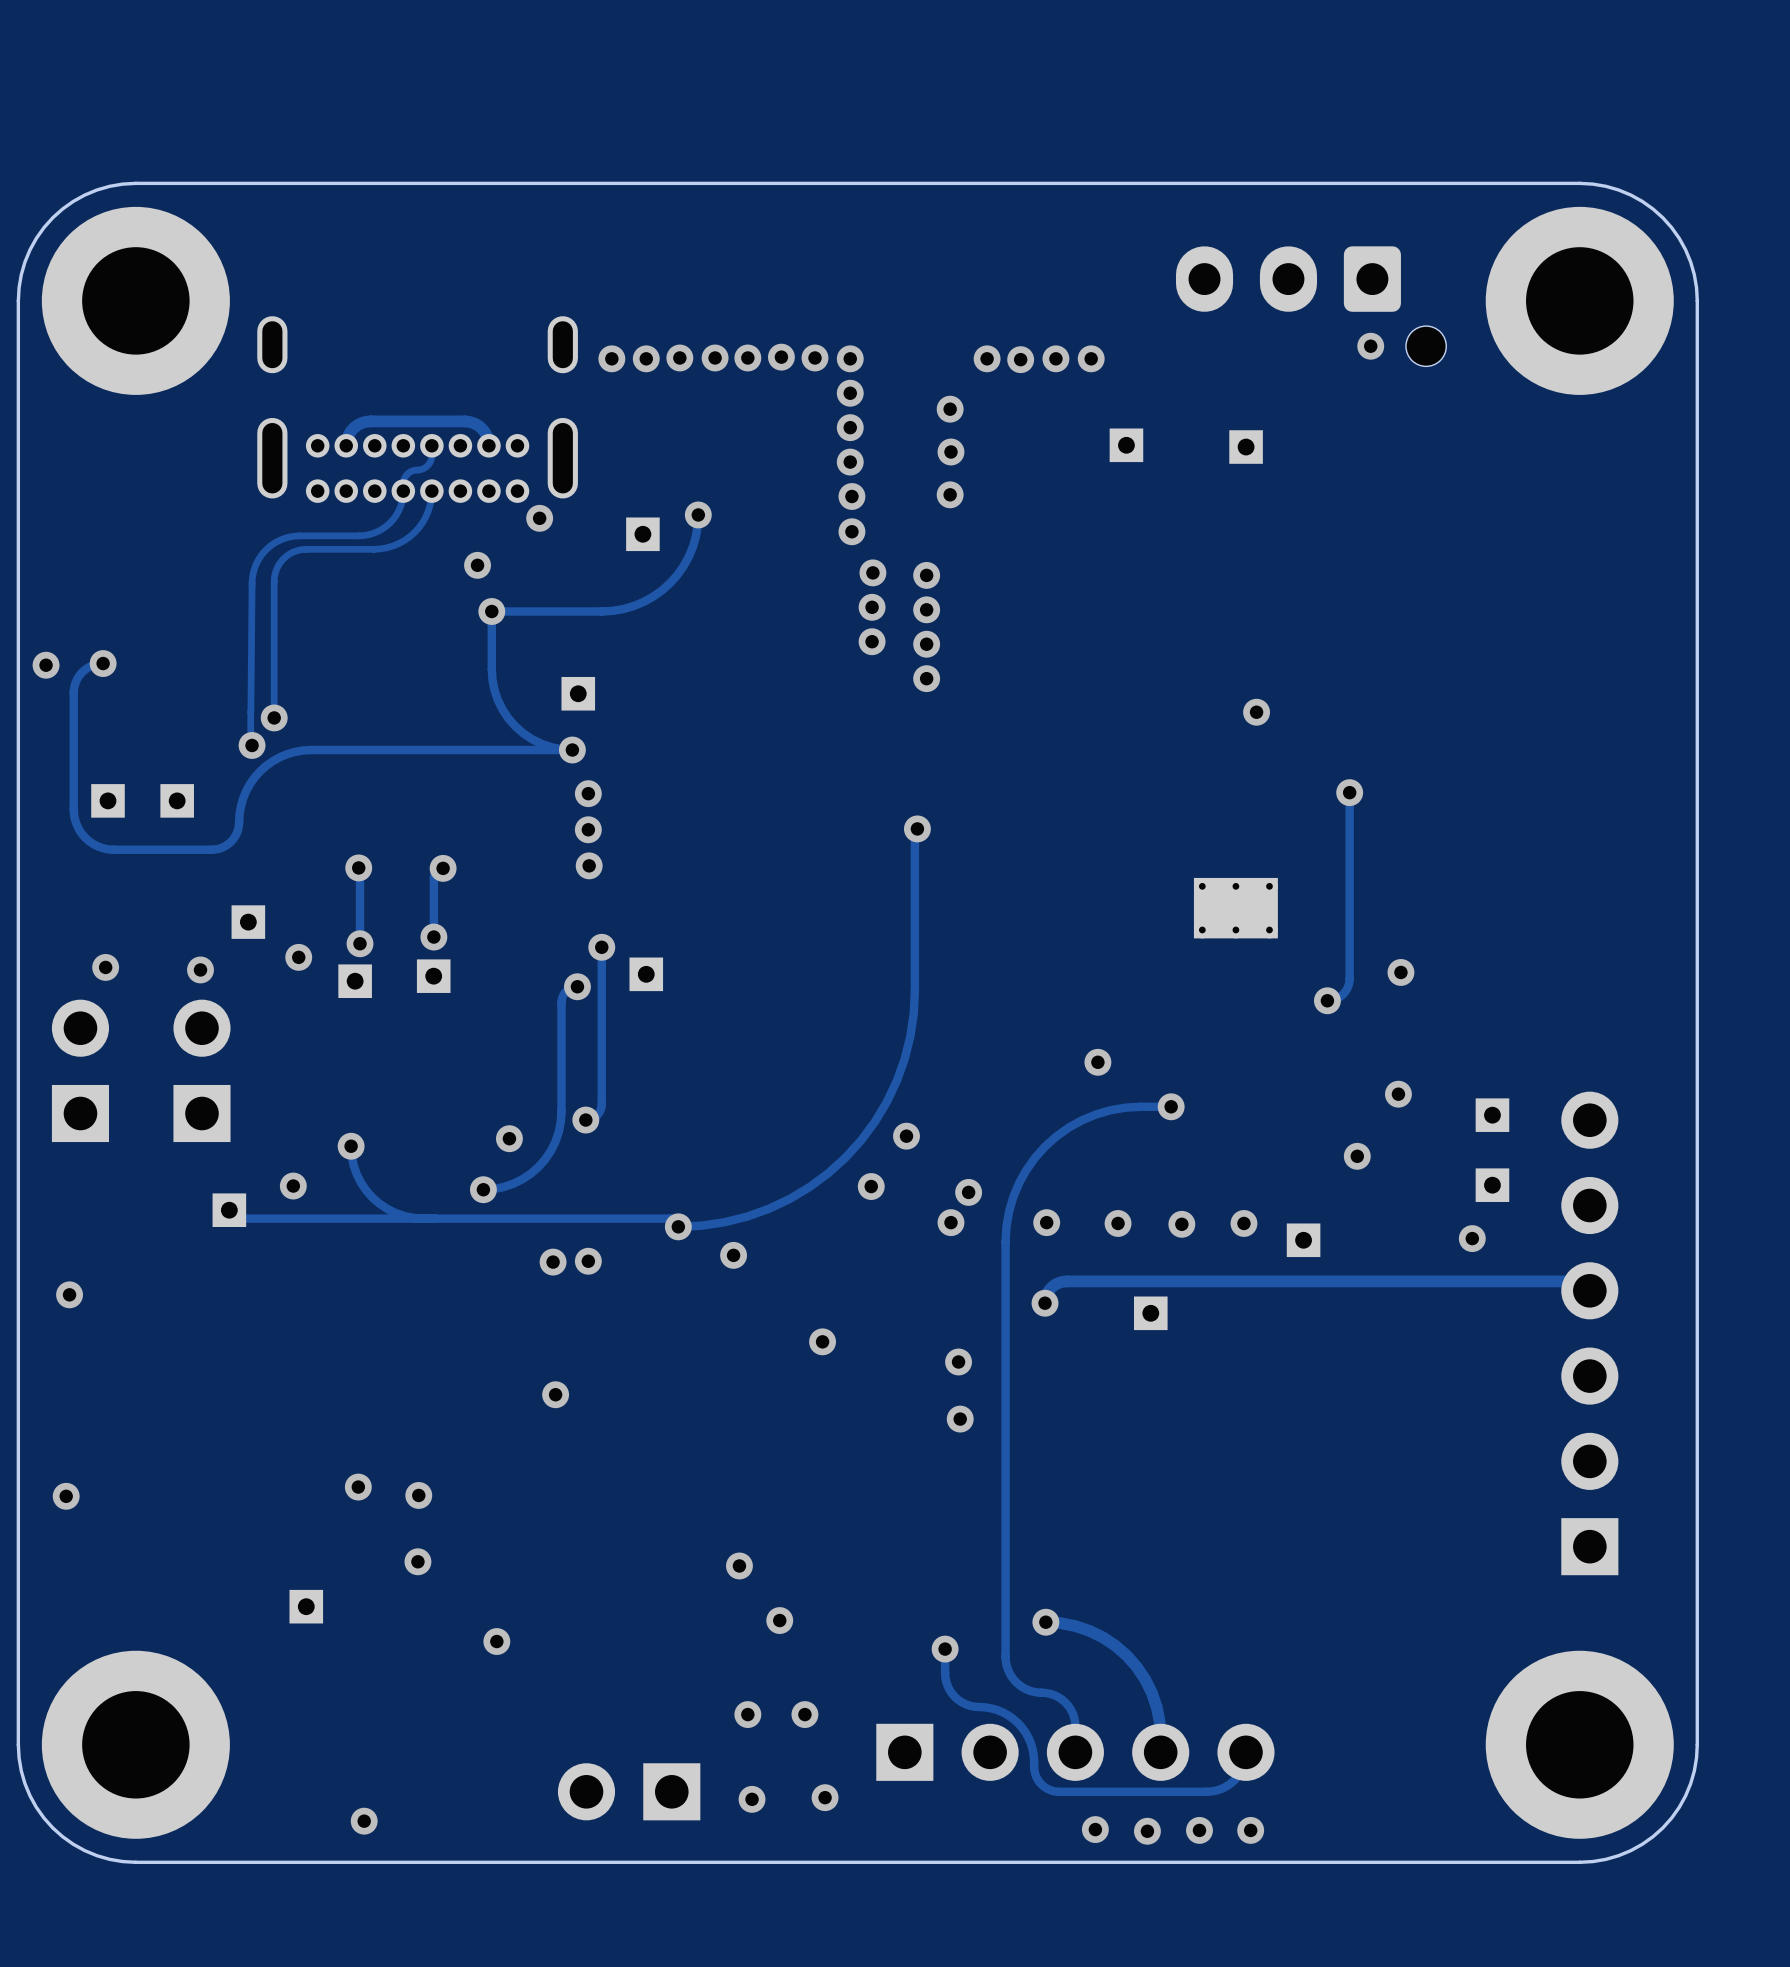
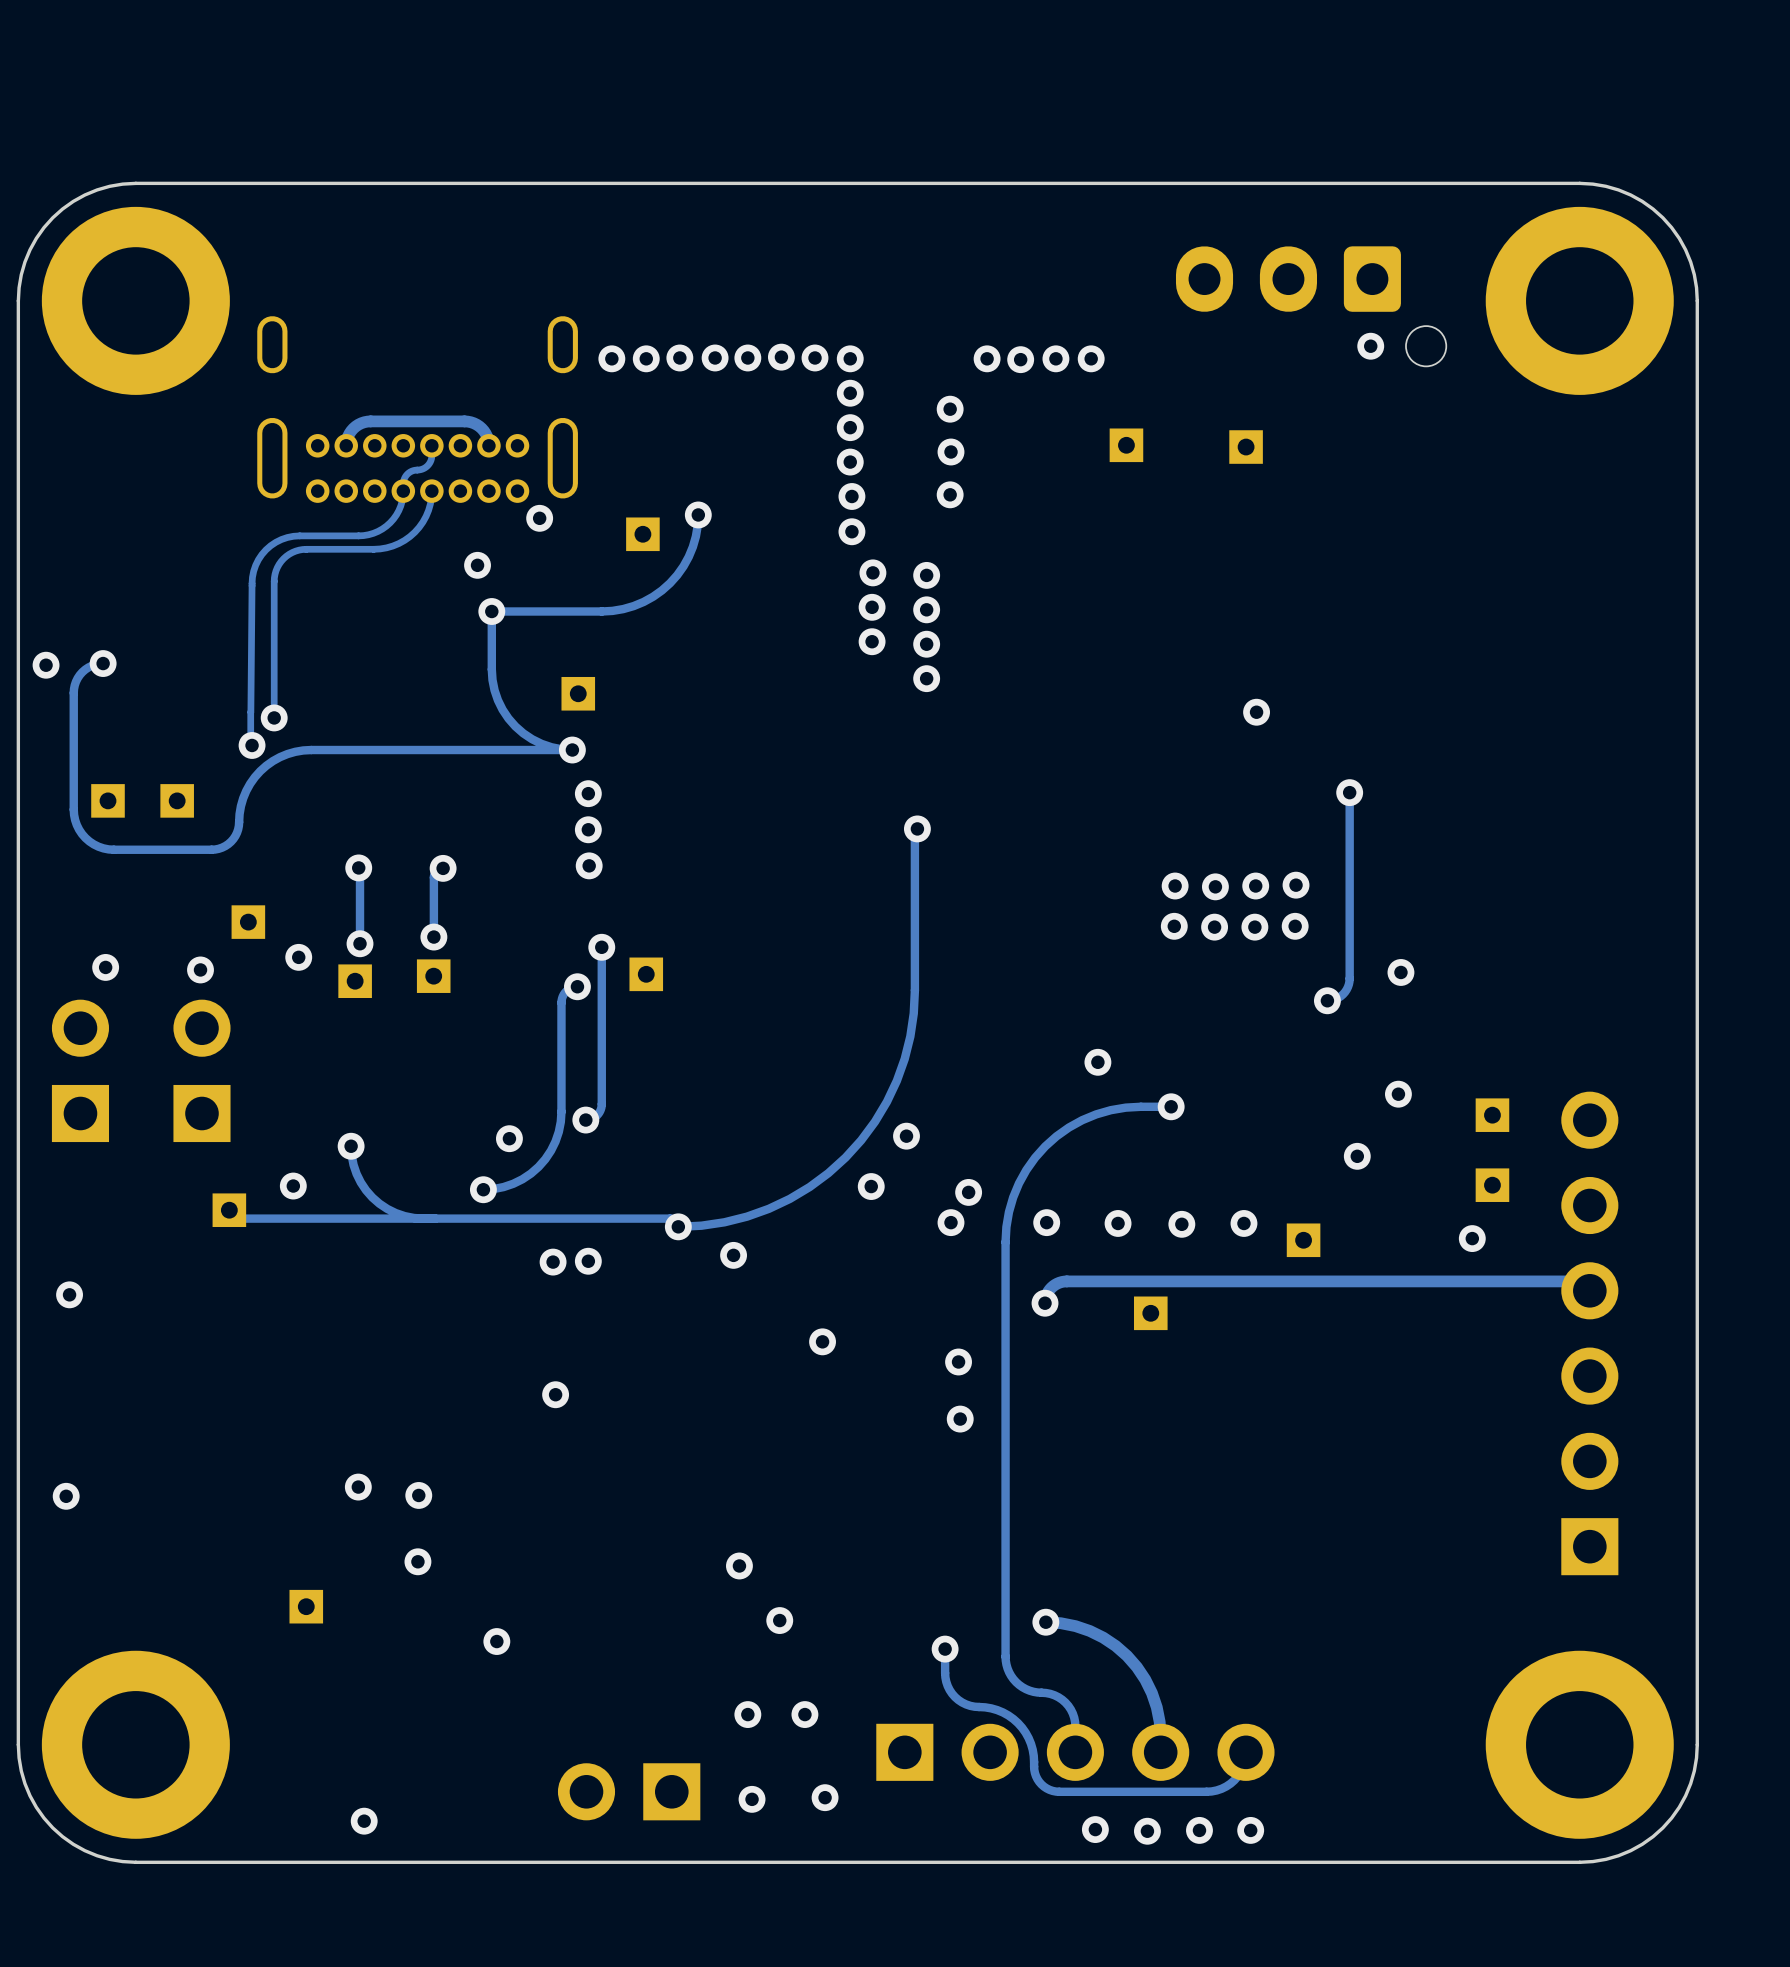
via: none -> (1296, 885)
via: none -> (1175, 886)
via: none -> (1215, 886)
via: none -> (1255, 886)
part: (1235, 908) -> none
via: none -> (1174, 926)
via: none -> (1295, 926)
via: none -> (1214, 927)
via: none -> (1254, 927)

